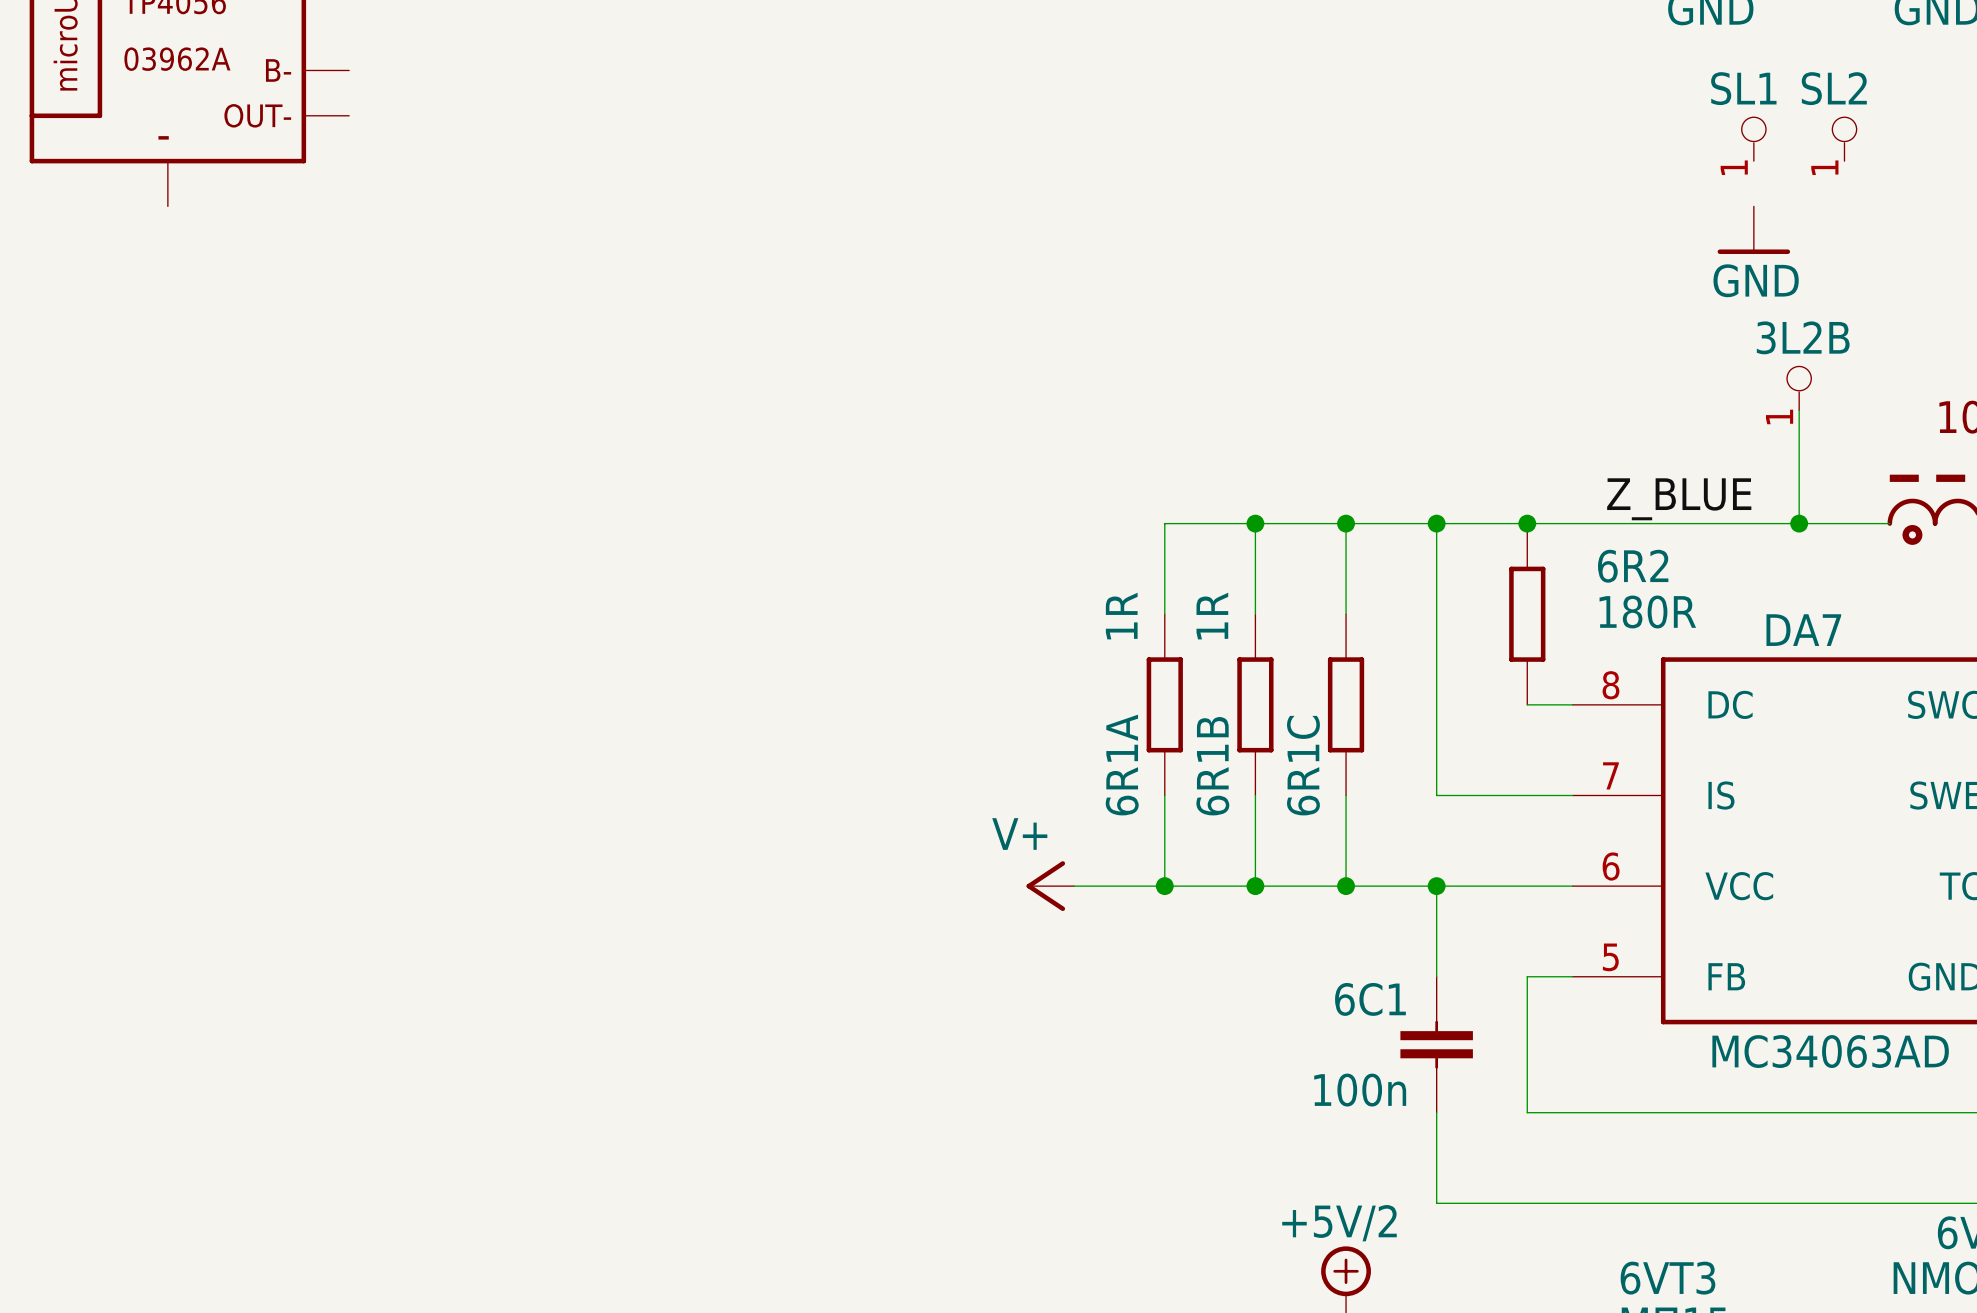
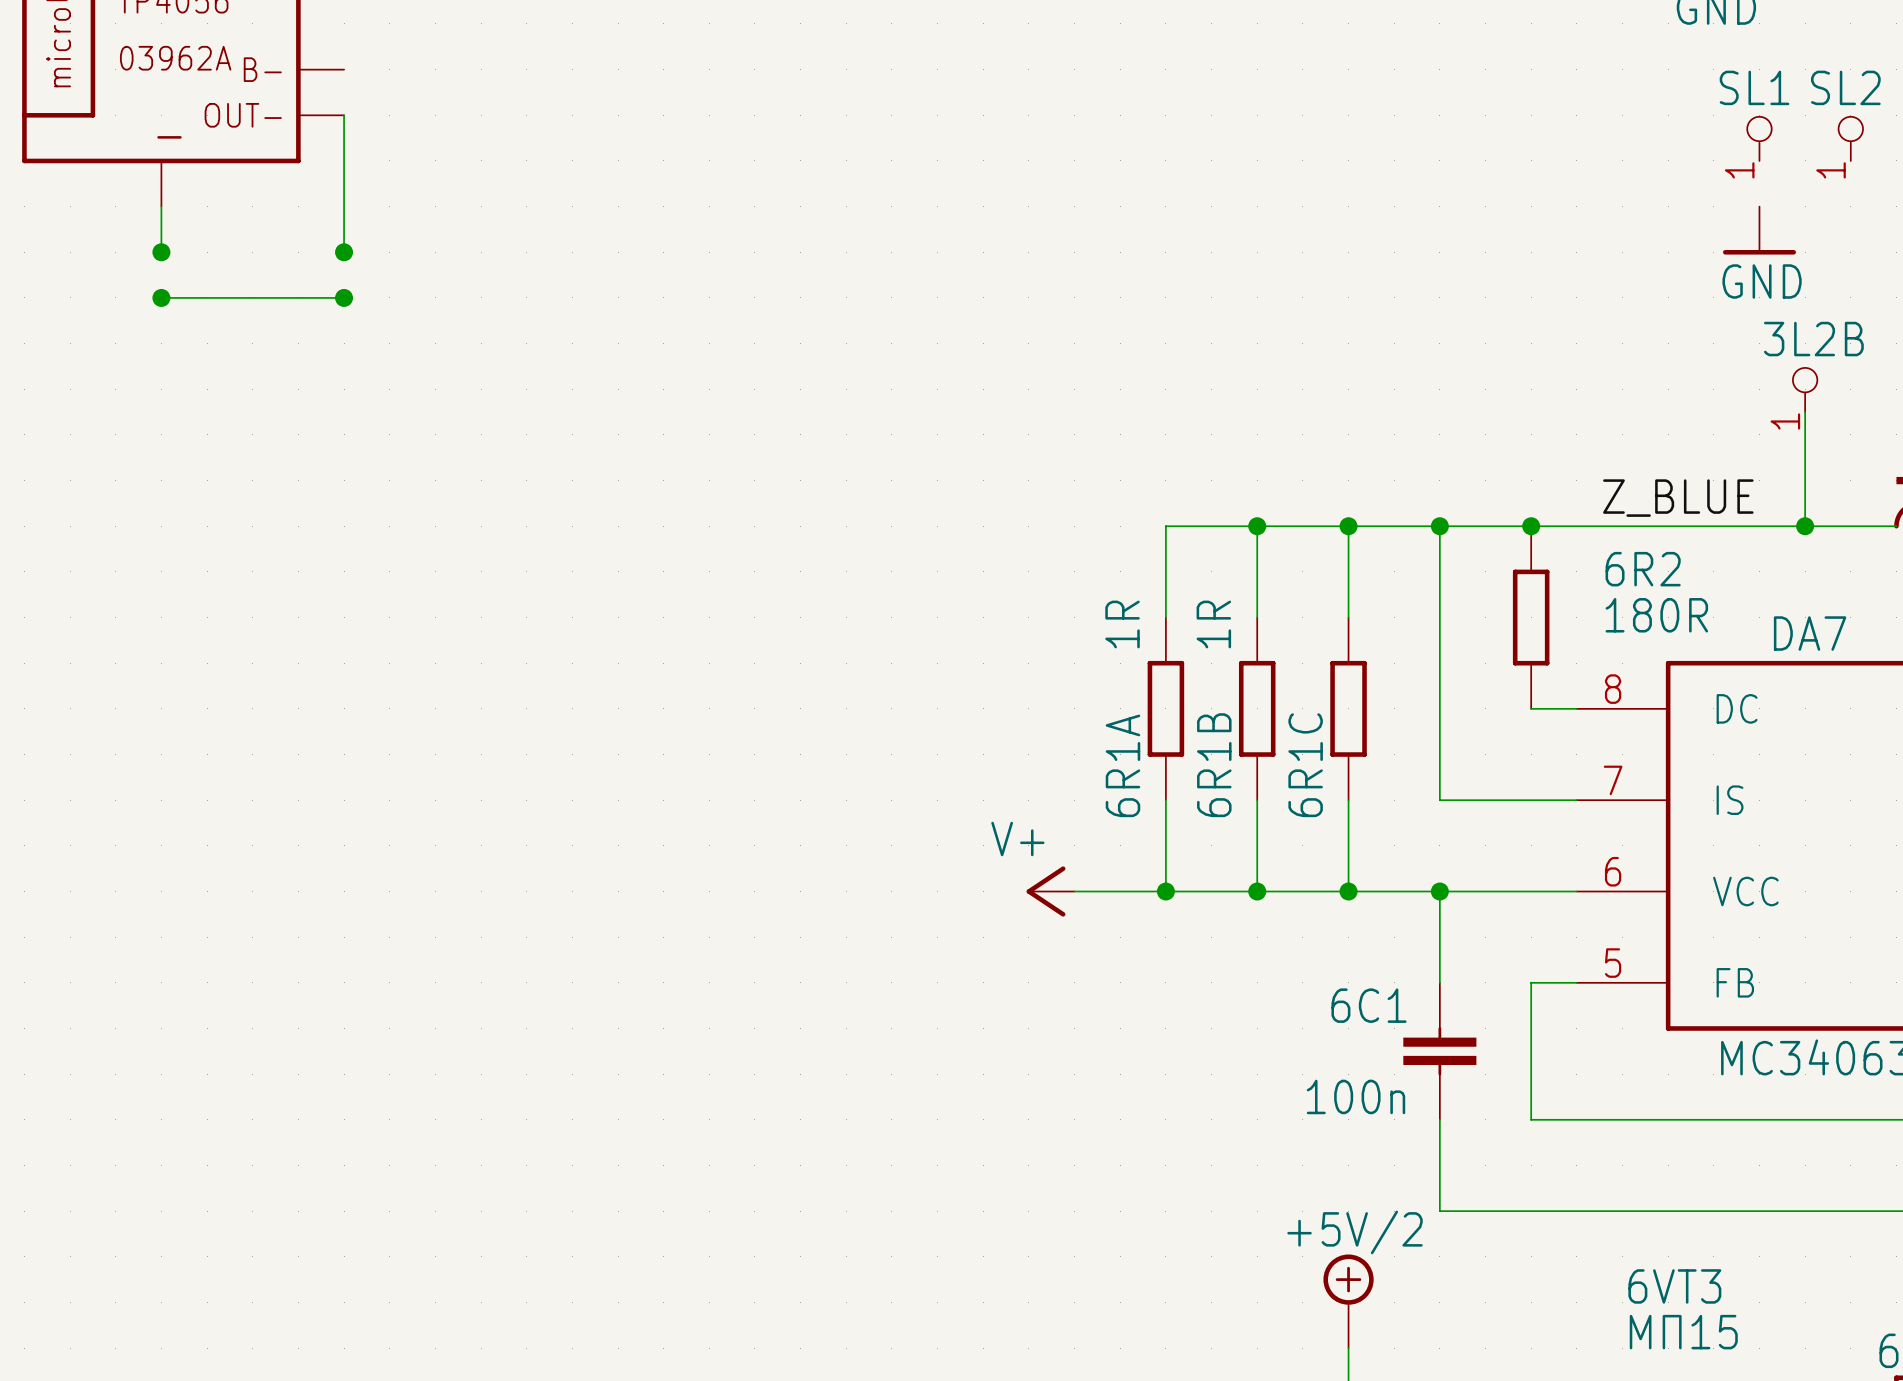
wire: none -> (344, 115) (344, 252)
wire: none -> (161, 206) (161, 252)
junction: none -> (161, 252)
junction: none -> (344, 252)
wire: none -> (161, 297) (344, 297)
junction: none -> (161, 297)
junction: none -> (344, 297)

